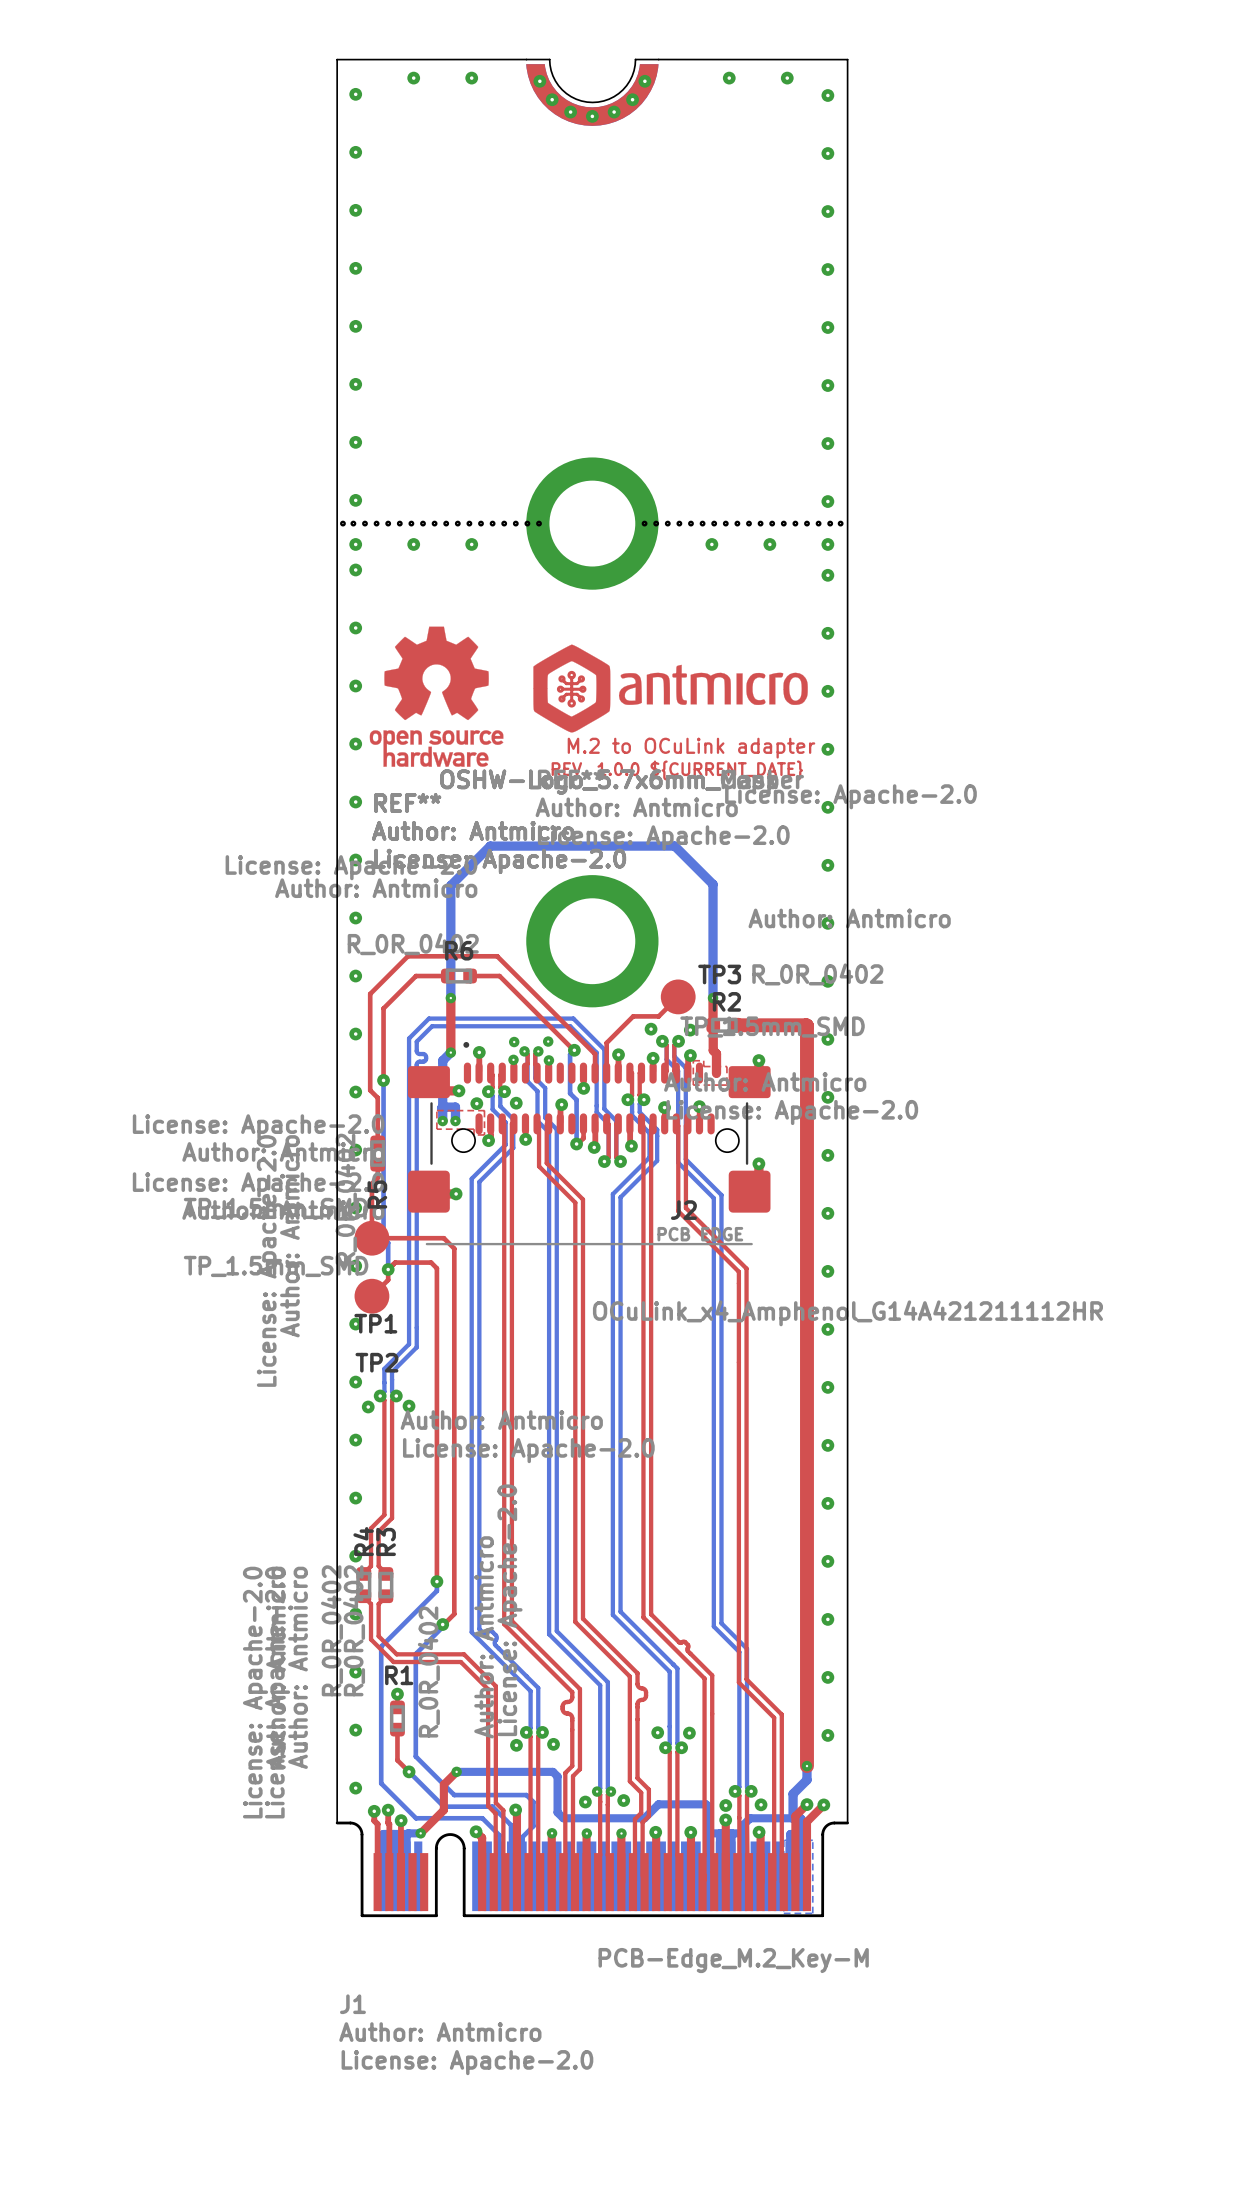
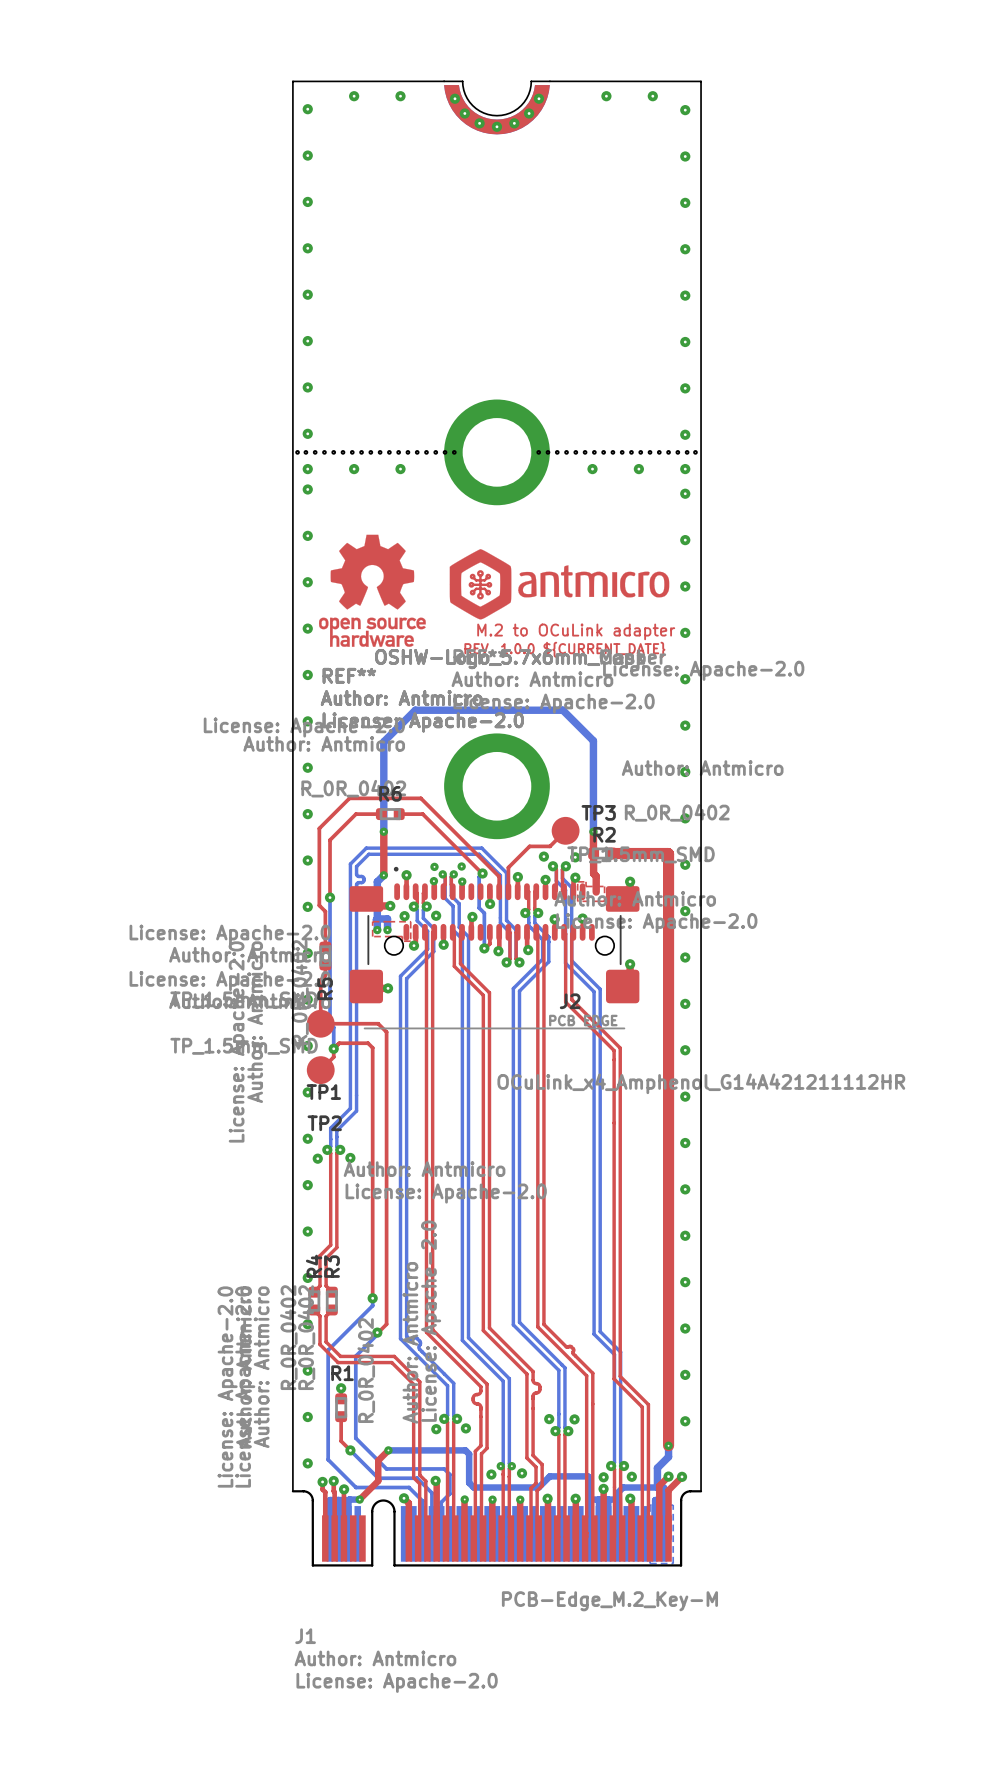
drawing: [525, 58, 660, 104] -> none
part footprint: [526, 64, 659, 126] -> [443, 80, 551, 135]

